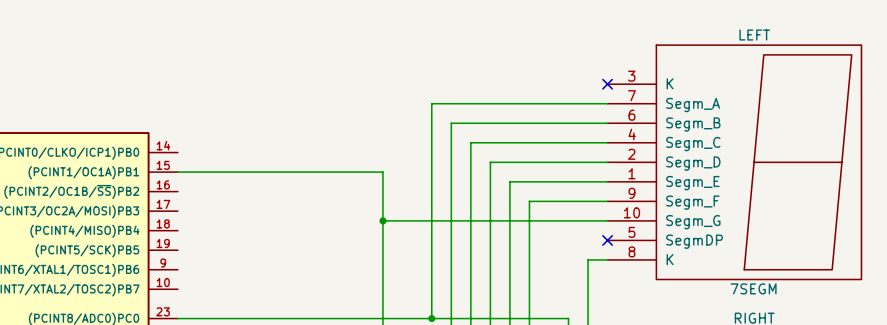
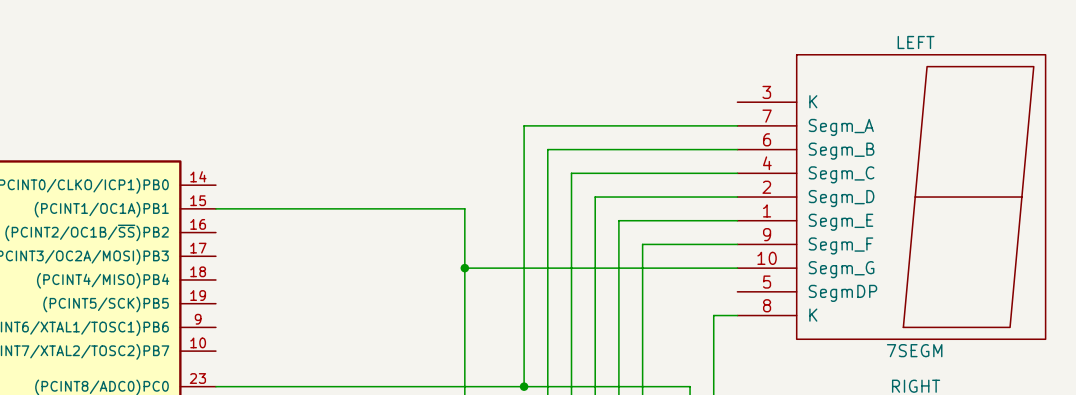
no-connect mark: (607, 84) -> none
no-connect mark: (607, 240) -> none

